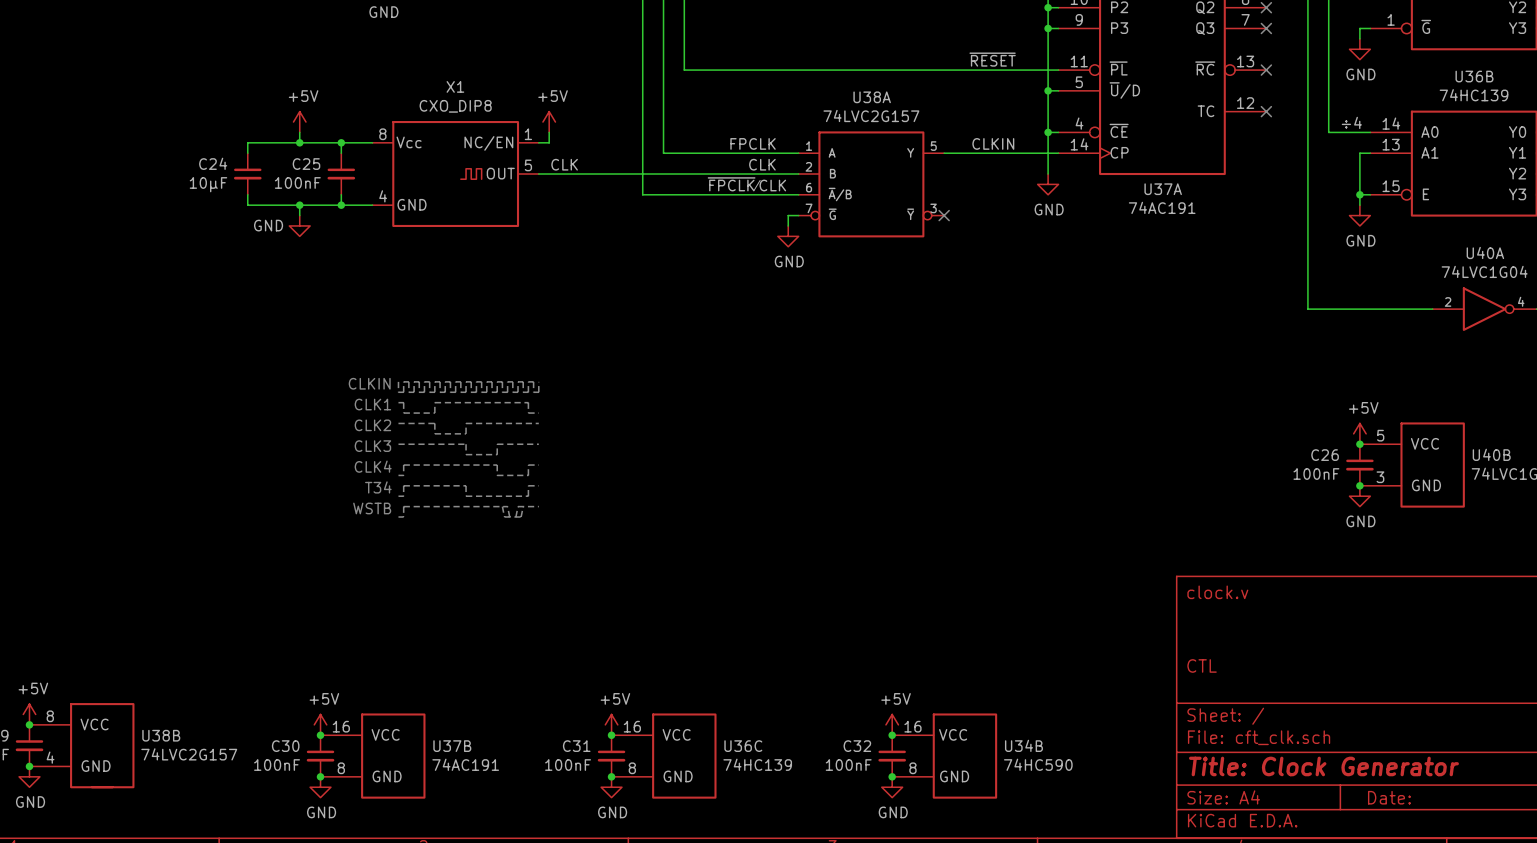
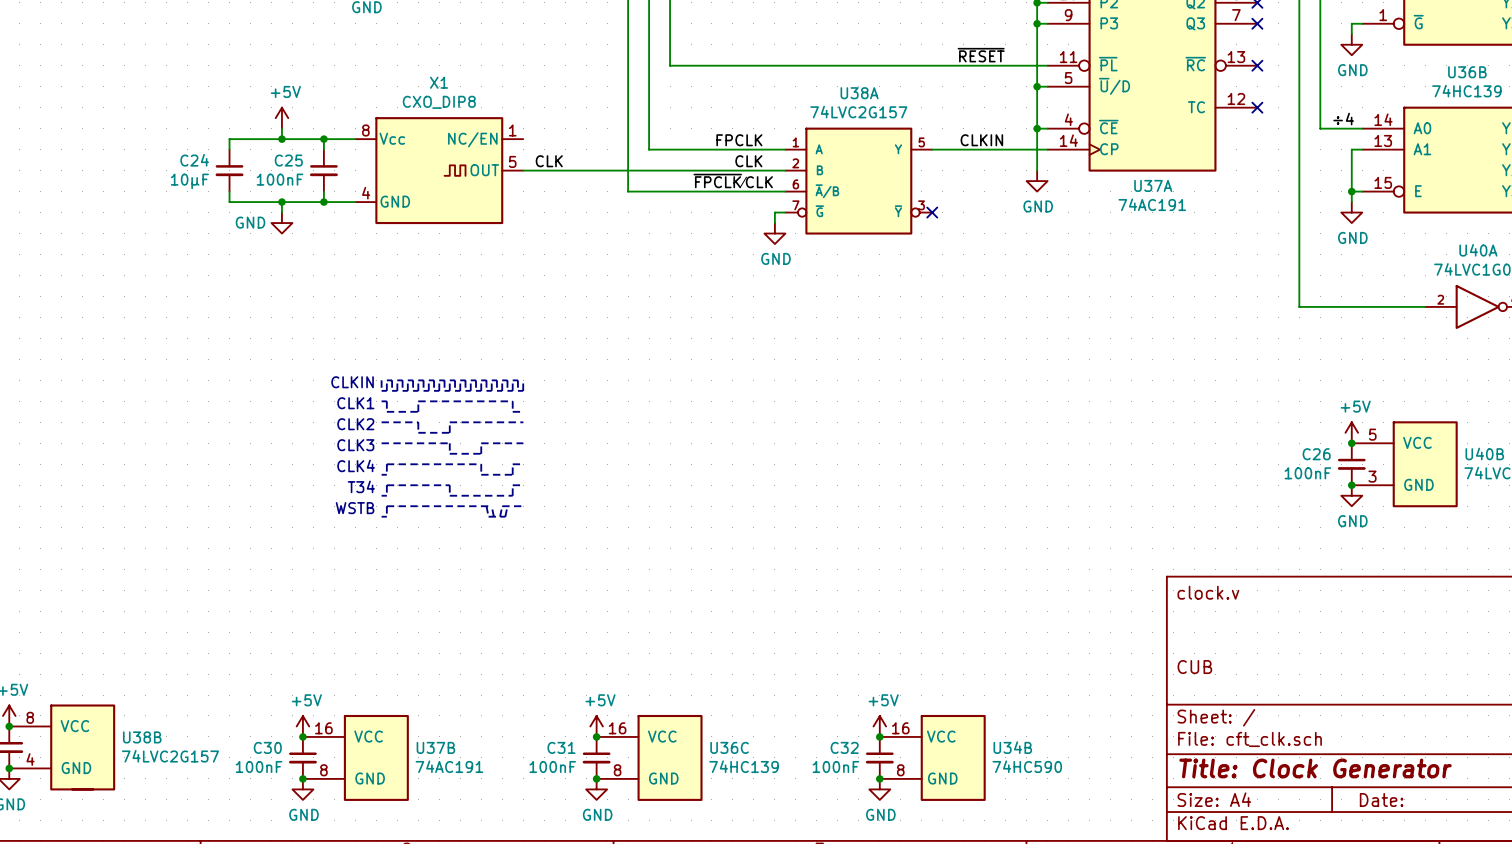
power symbol: +5V (549, 122) -> none
wire: (549, 132) (549, 142) (538, 142) -> none
title block: CTL (1202, 665) -> CUB (1194, 667)

